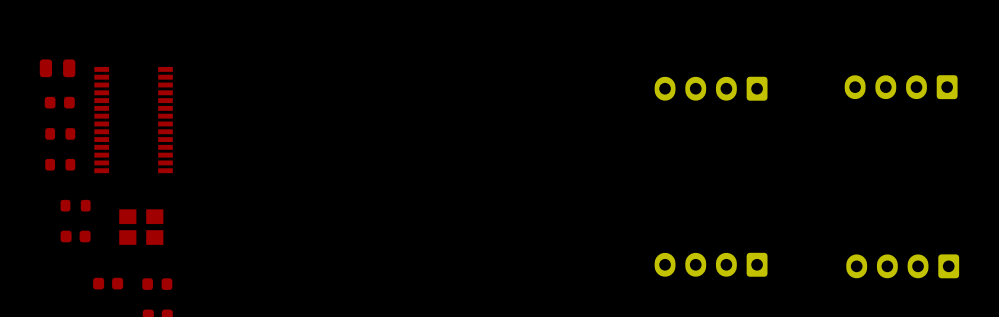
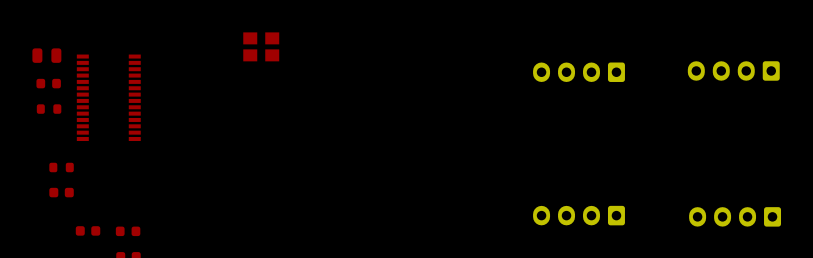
part: (60, 164) -> none
part position: (141, 227) -> (261, 46)

